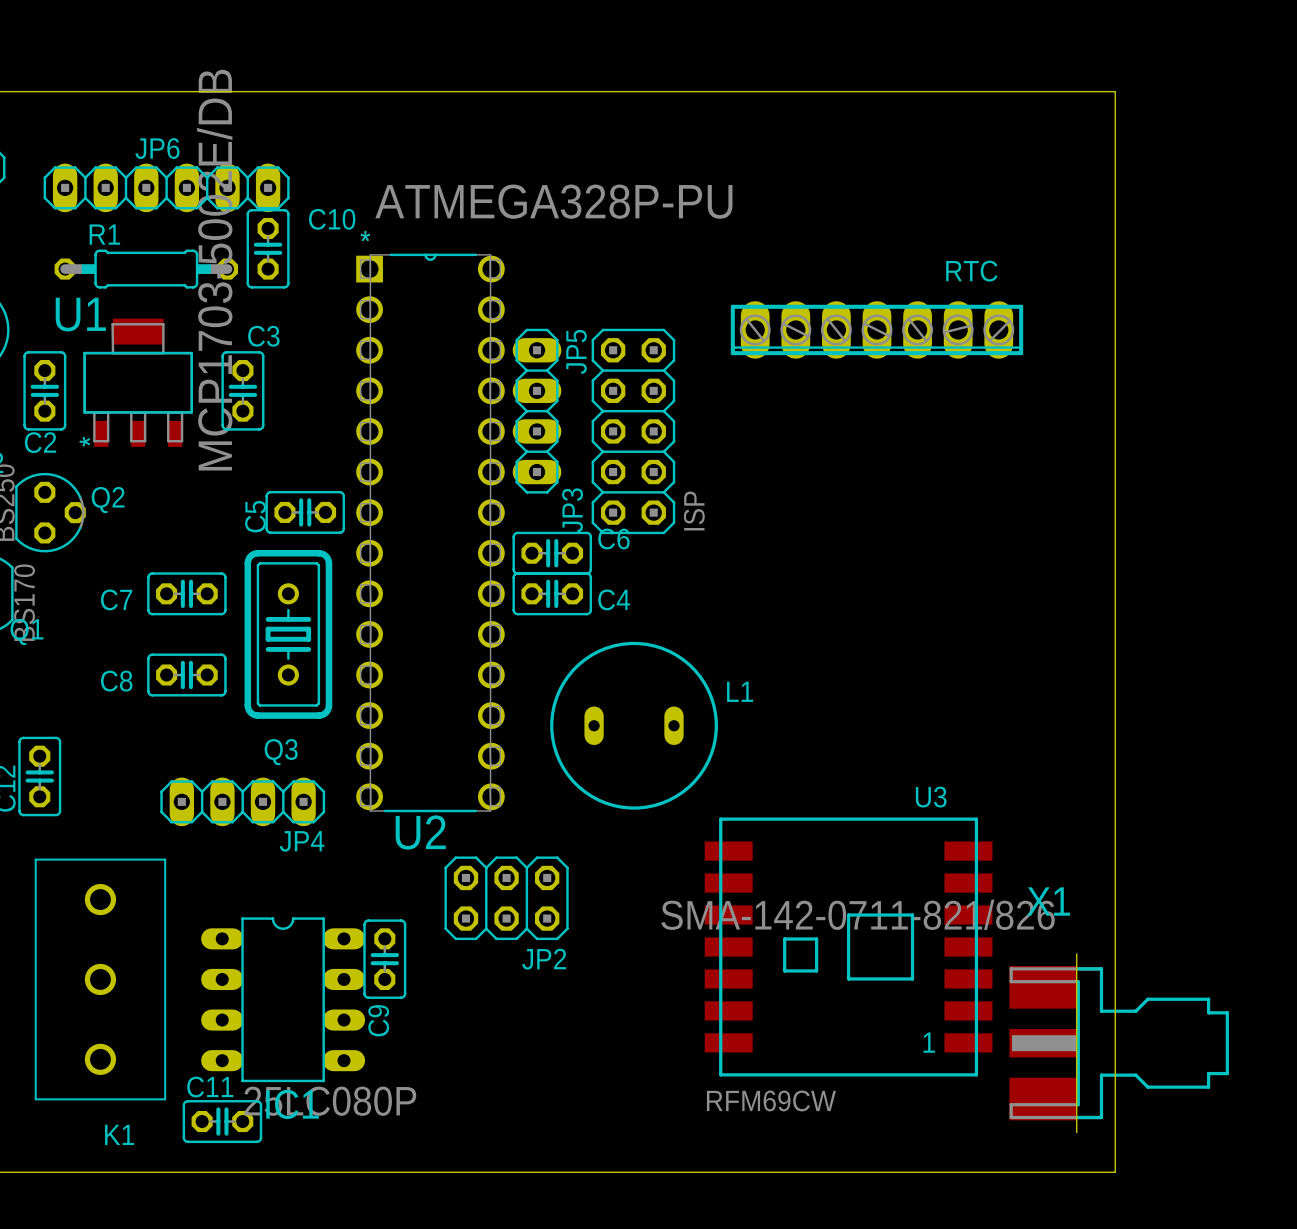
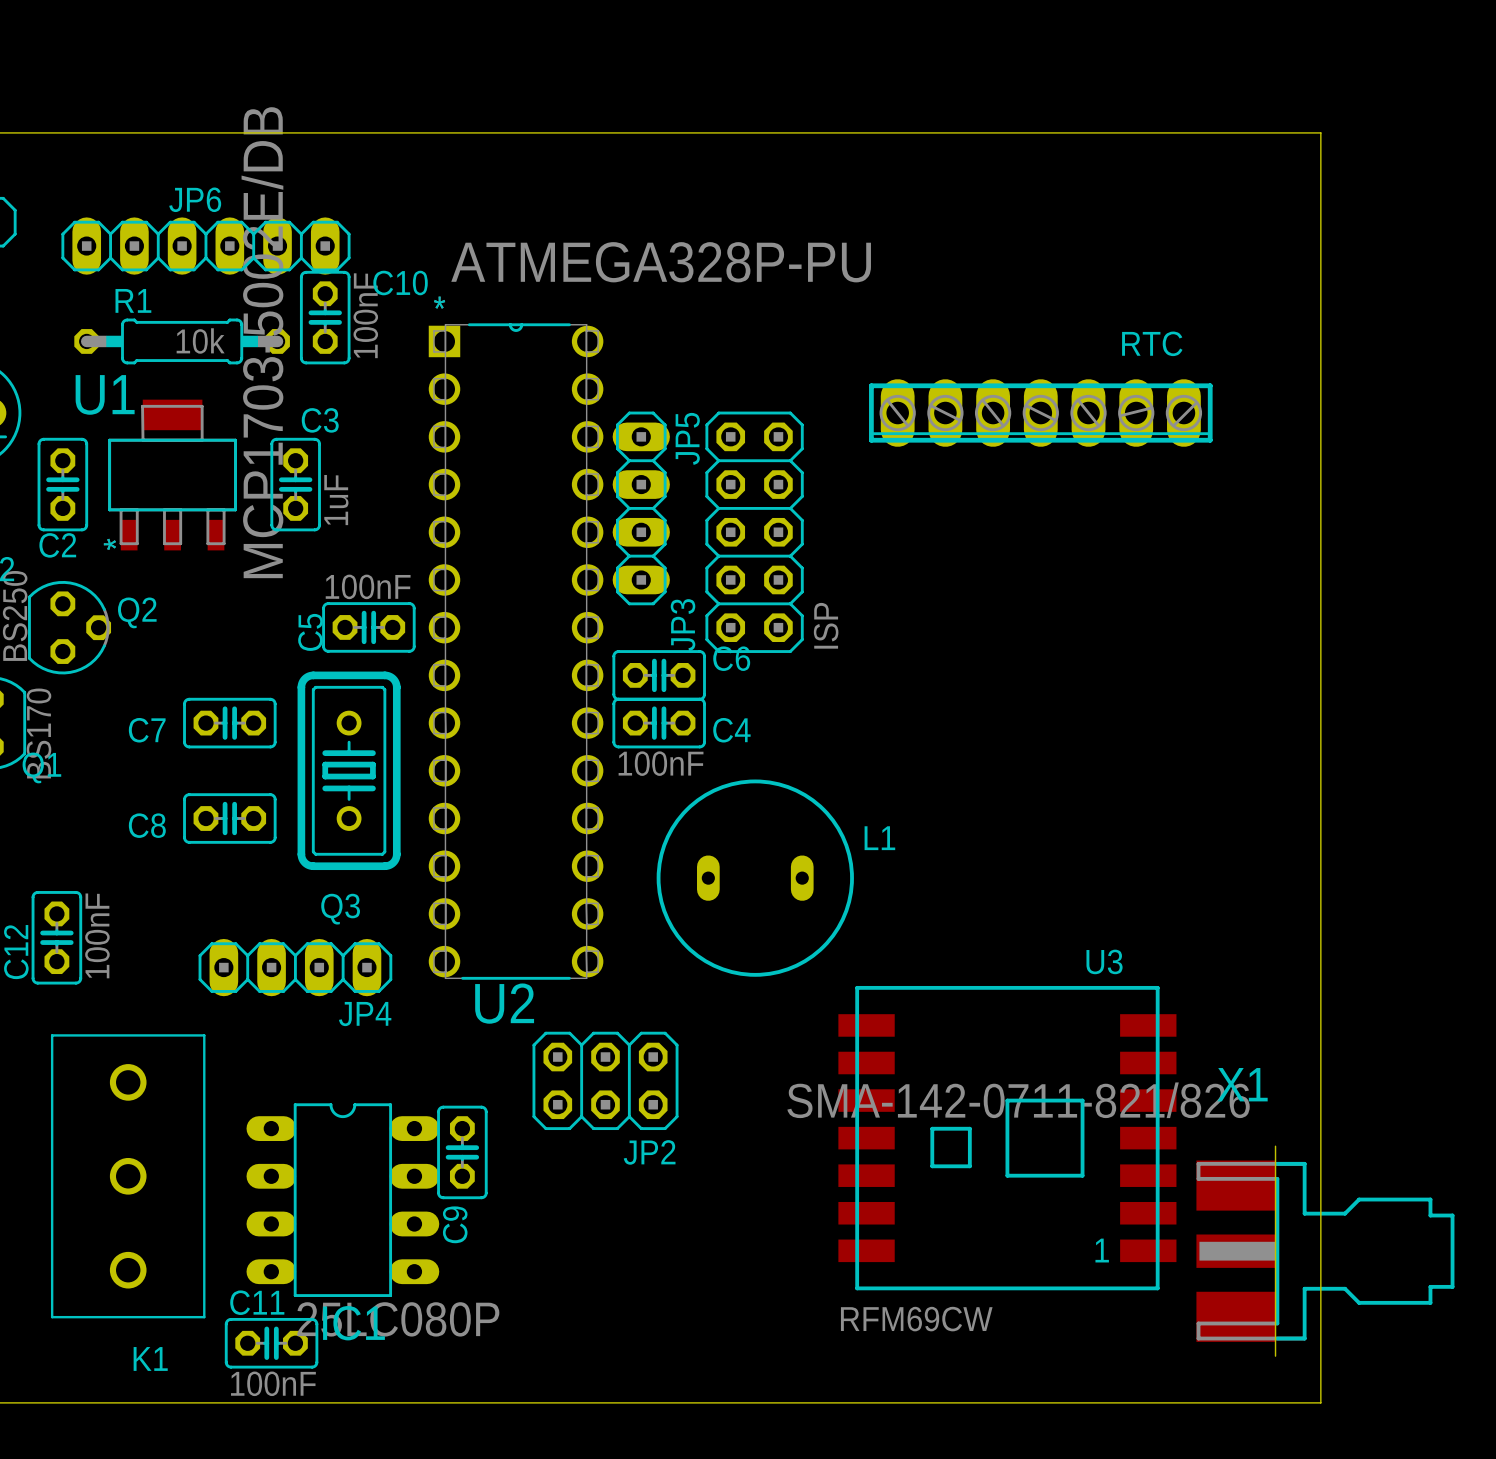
C10 value: none -> 100nF (365, 315)
R1 value: none -> 10k (200, 340)
C3 value: none -> 1uF (336, 500)
C5 value: none -> 100nF (368, 586)
C4 value: none -> 100nF (661, 763)
C12 value: none -> 100nF (97, 935)
C11 value: none -> 100nF (273, 1383)

